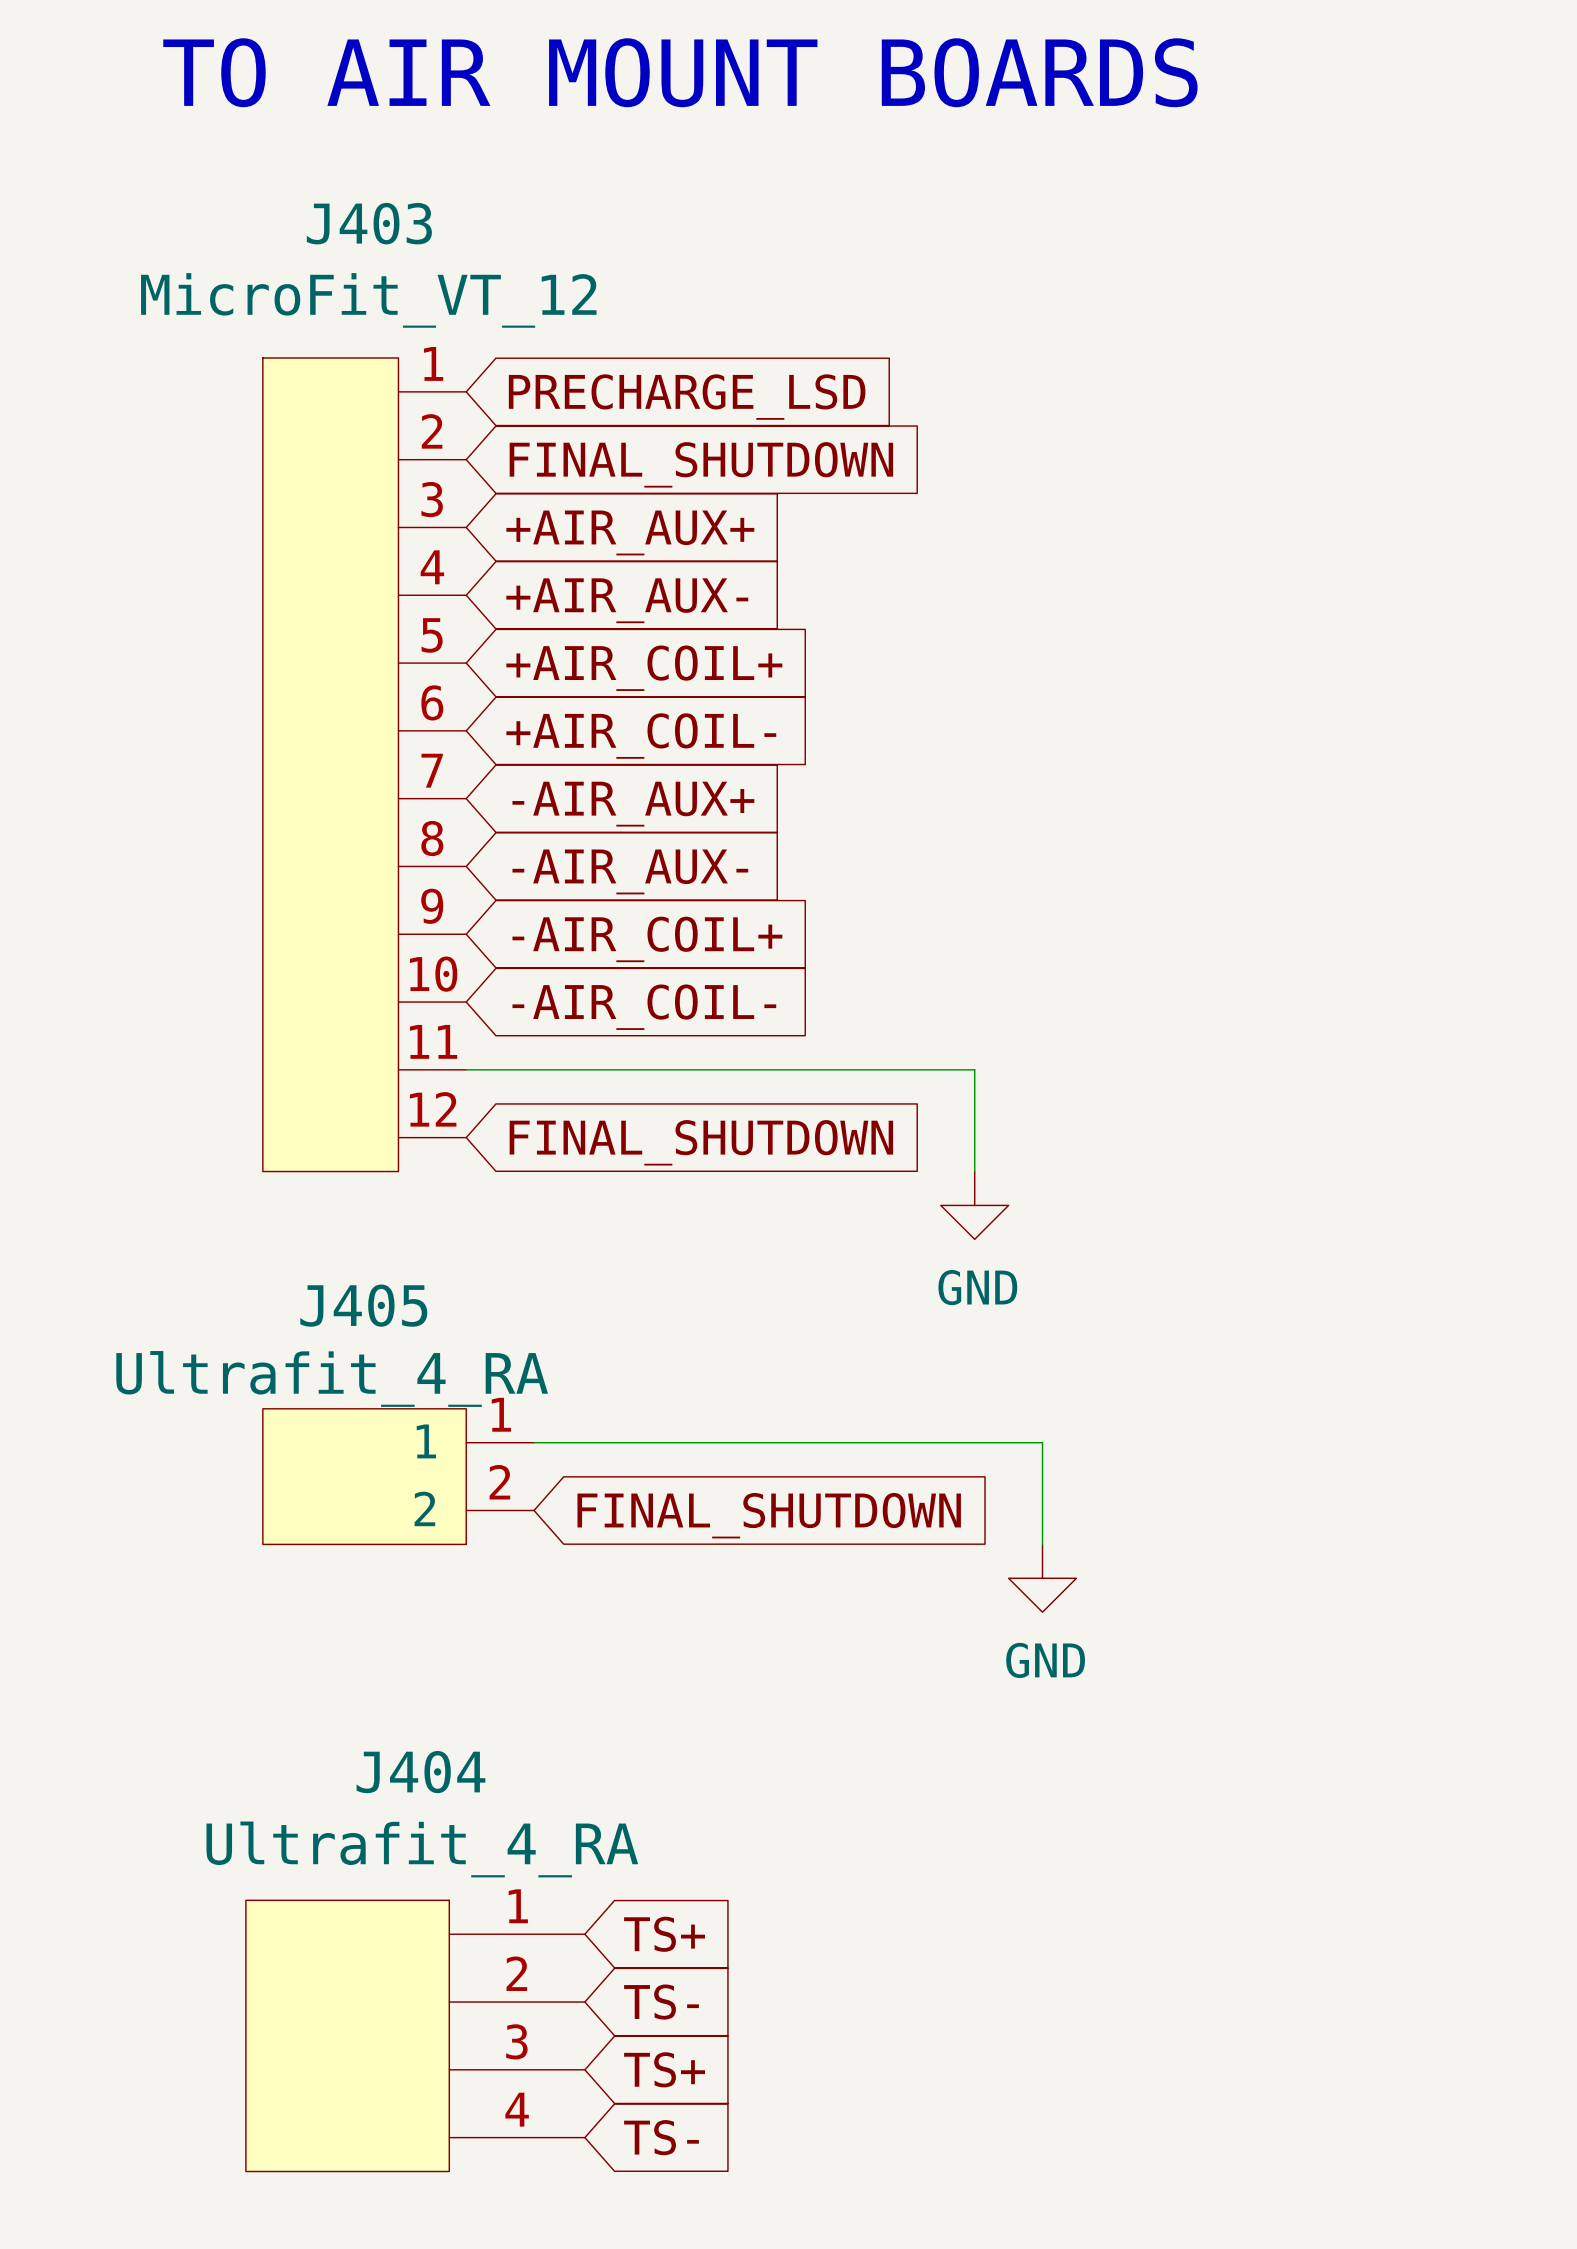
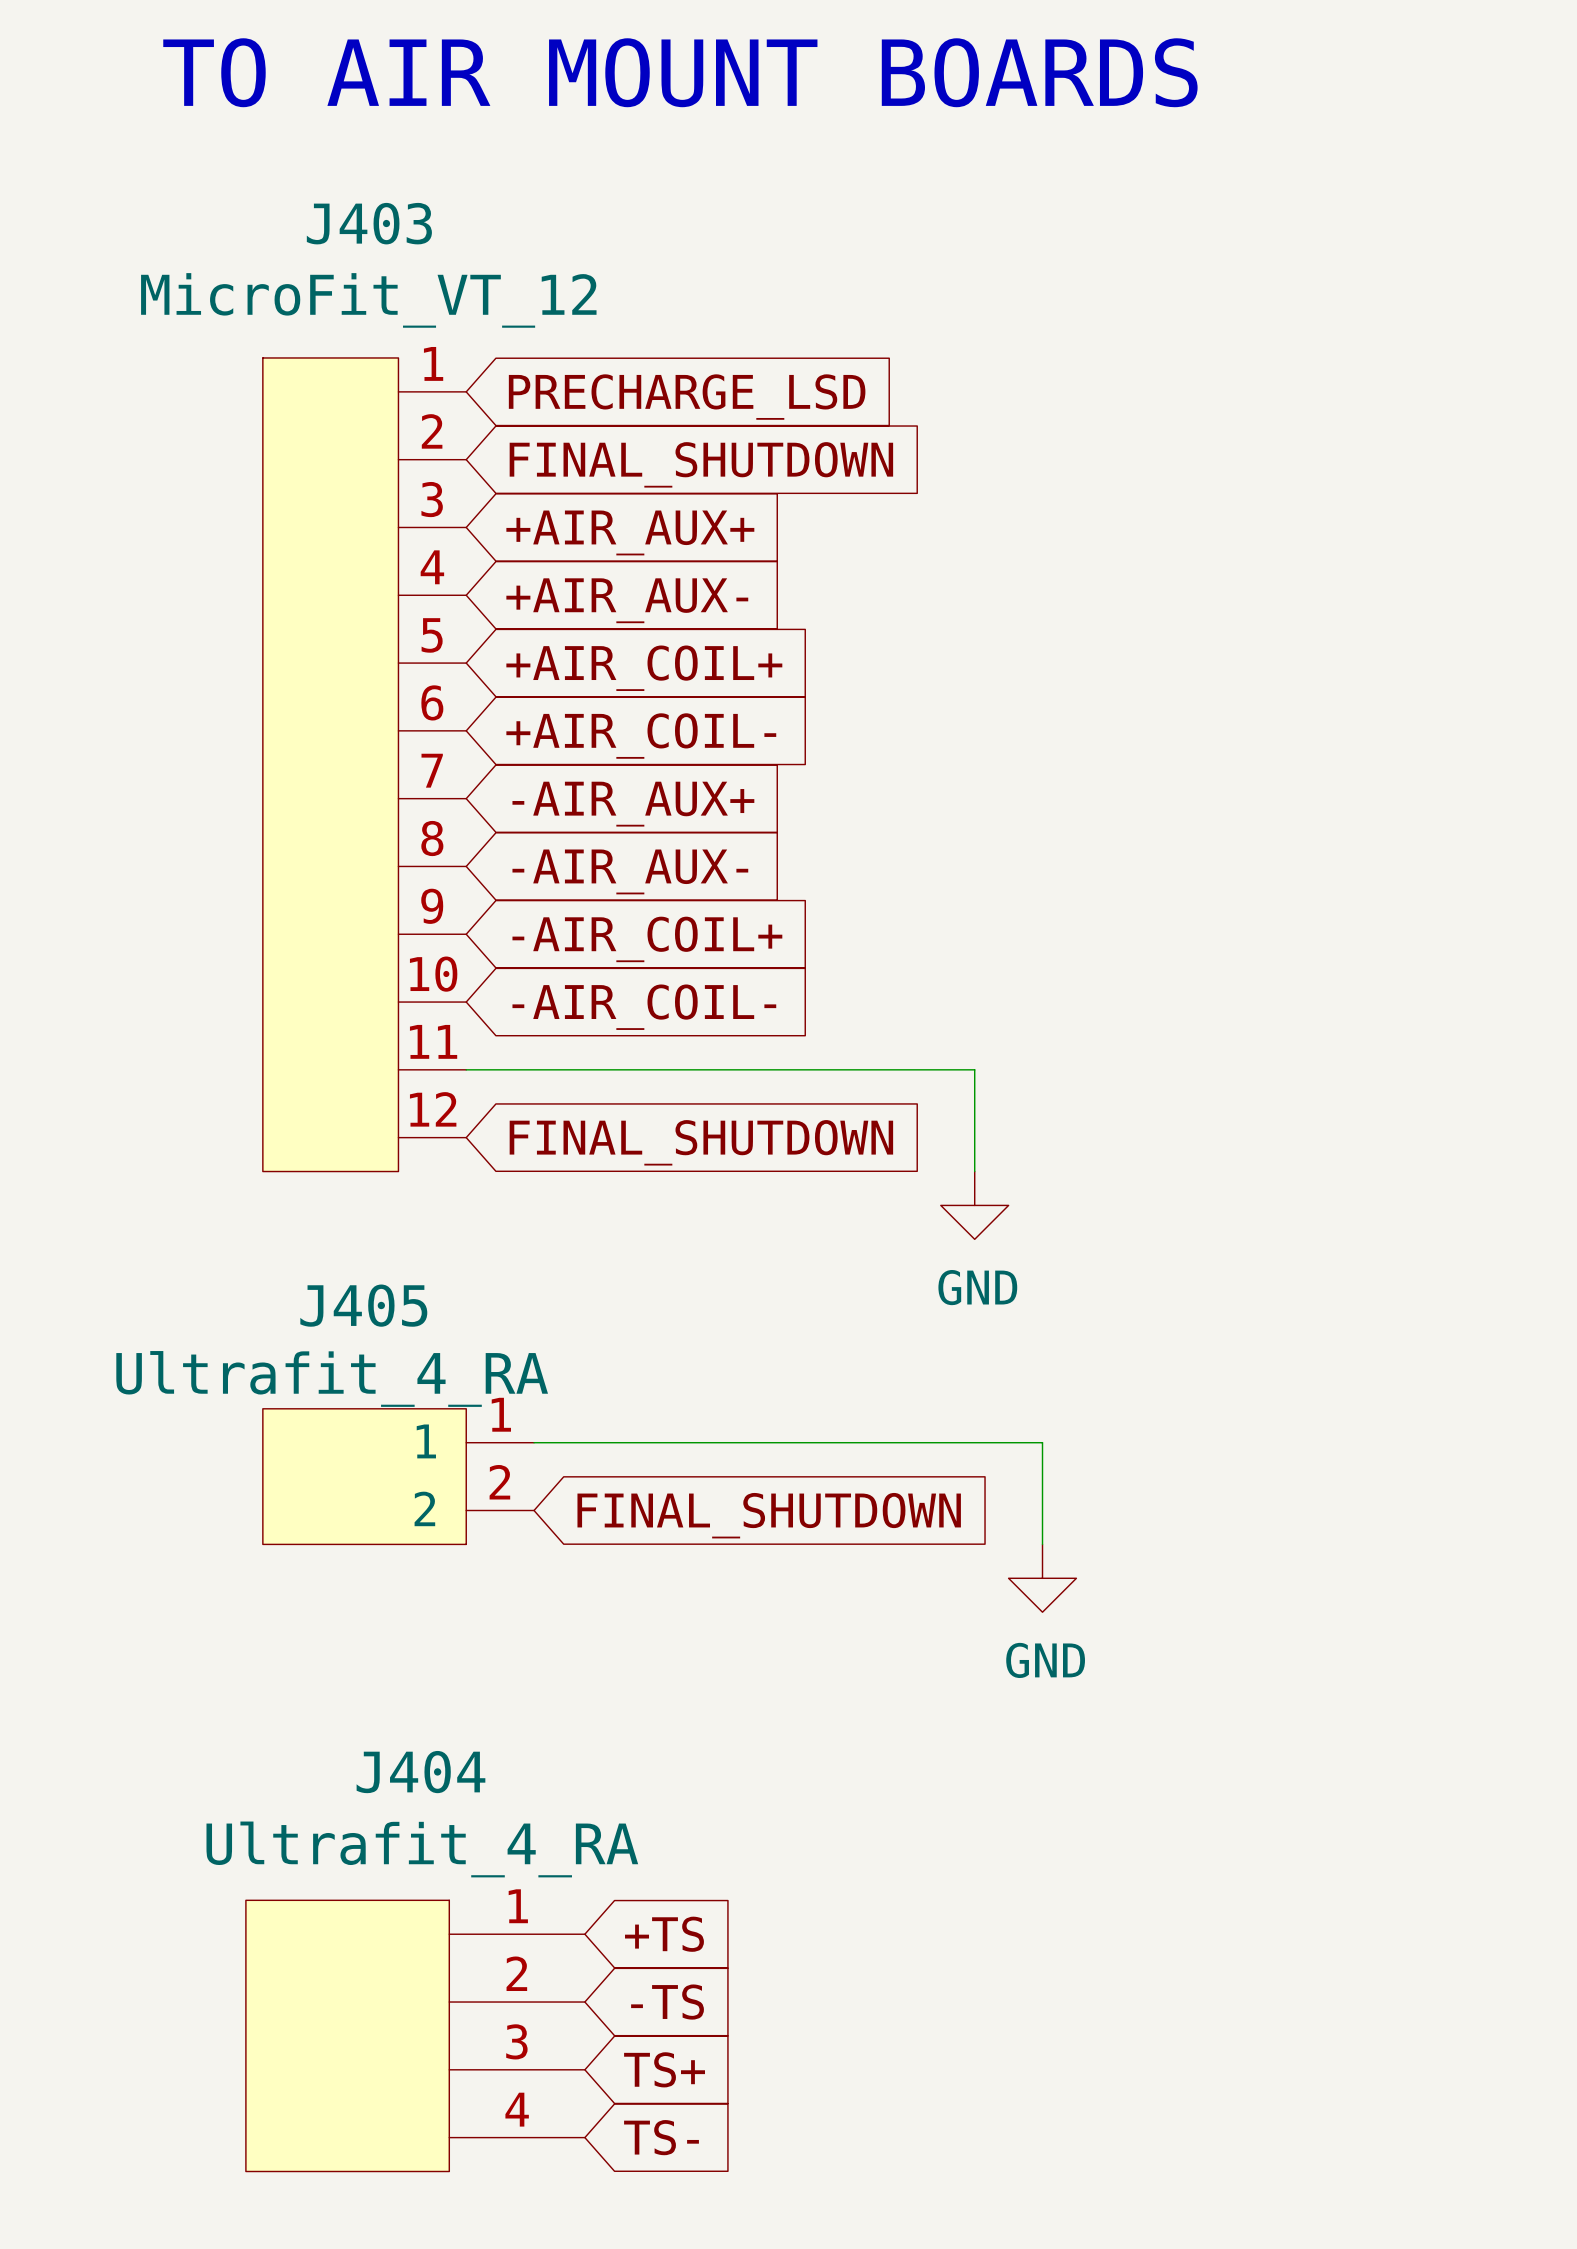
global label: TS+ (664, 1934) -> +TS (664, 1934)
global label: TS- (661, 2002) -> -TS (667, 2002)

